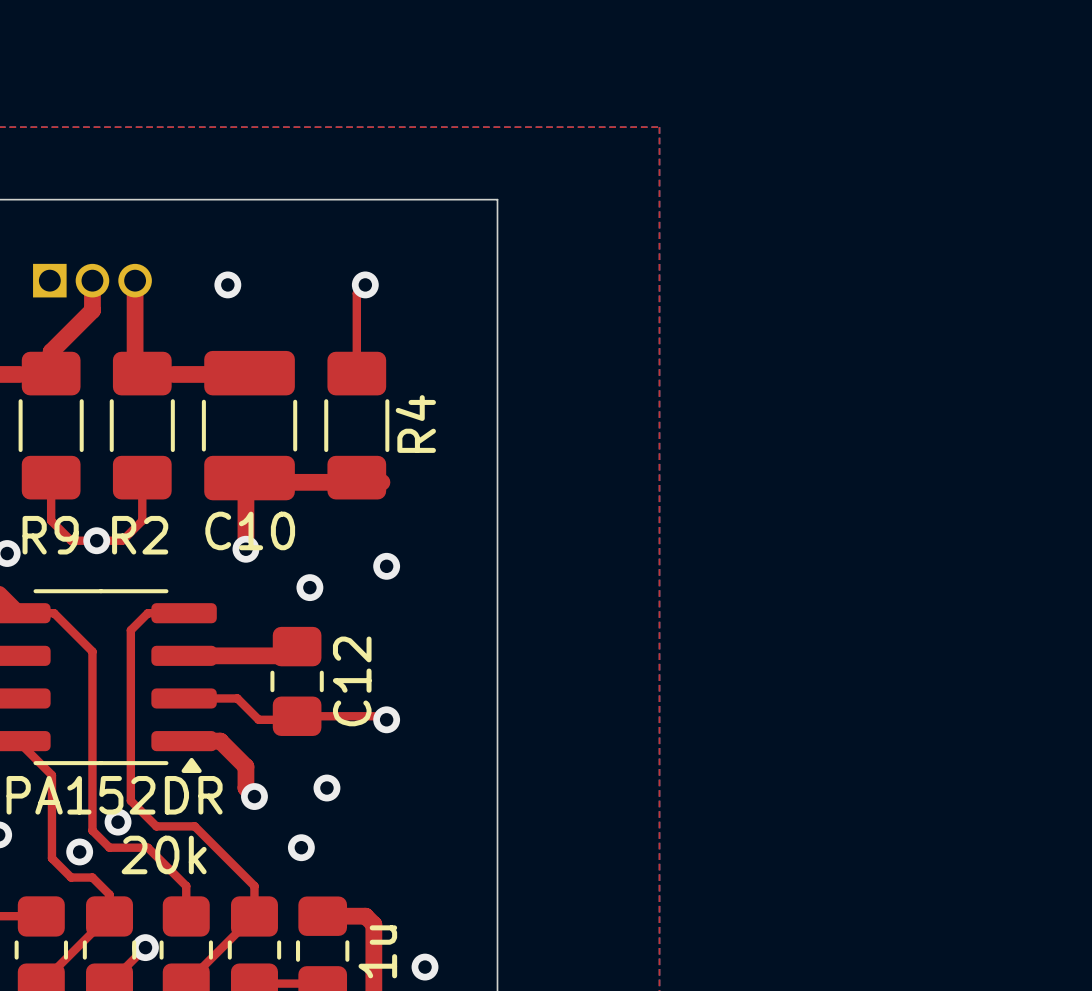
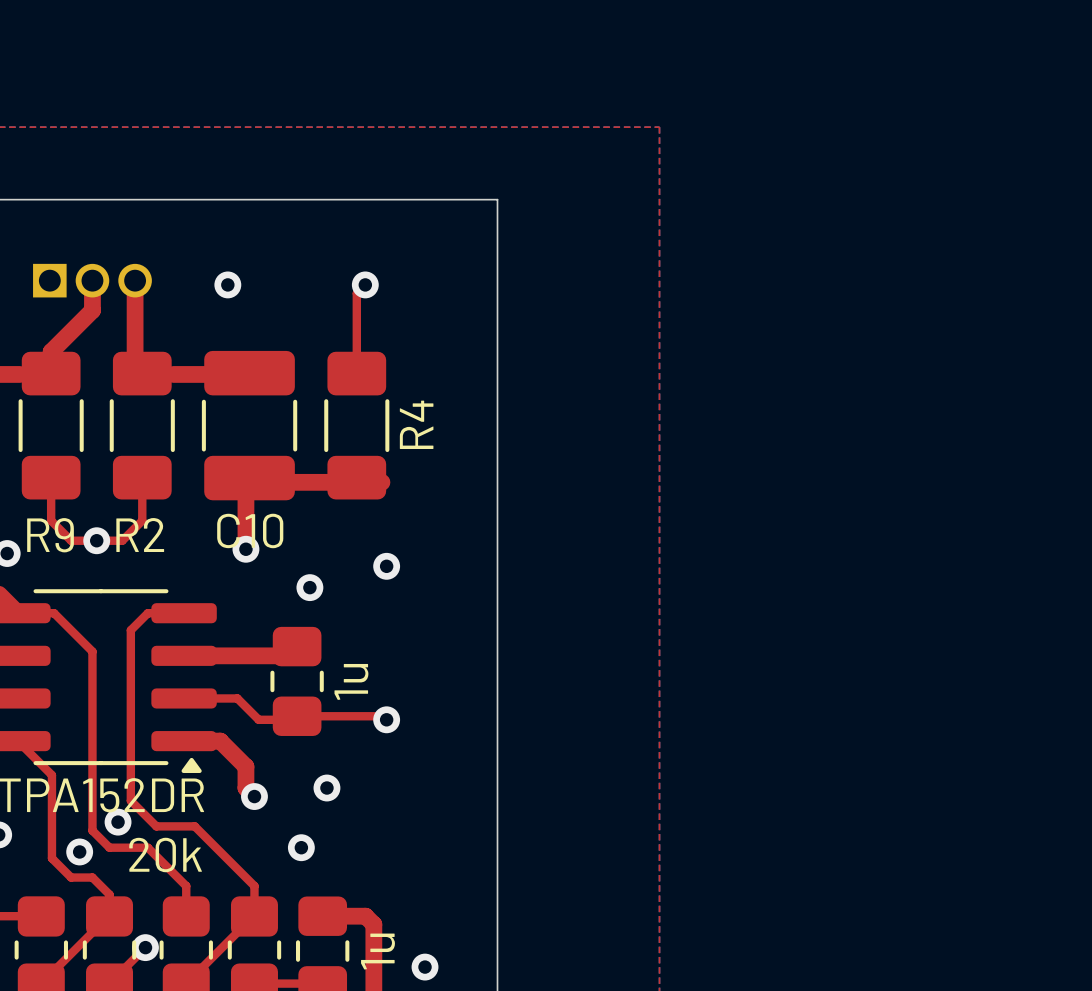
C12 name: C12 (352, 681) -> none
C12 value: none -> 1u (351, 681)

